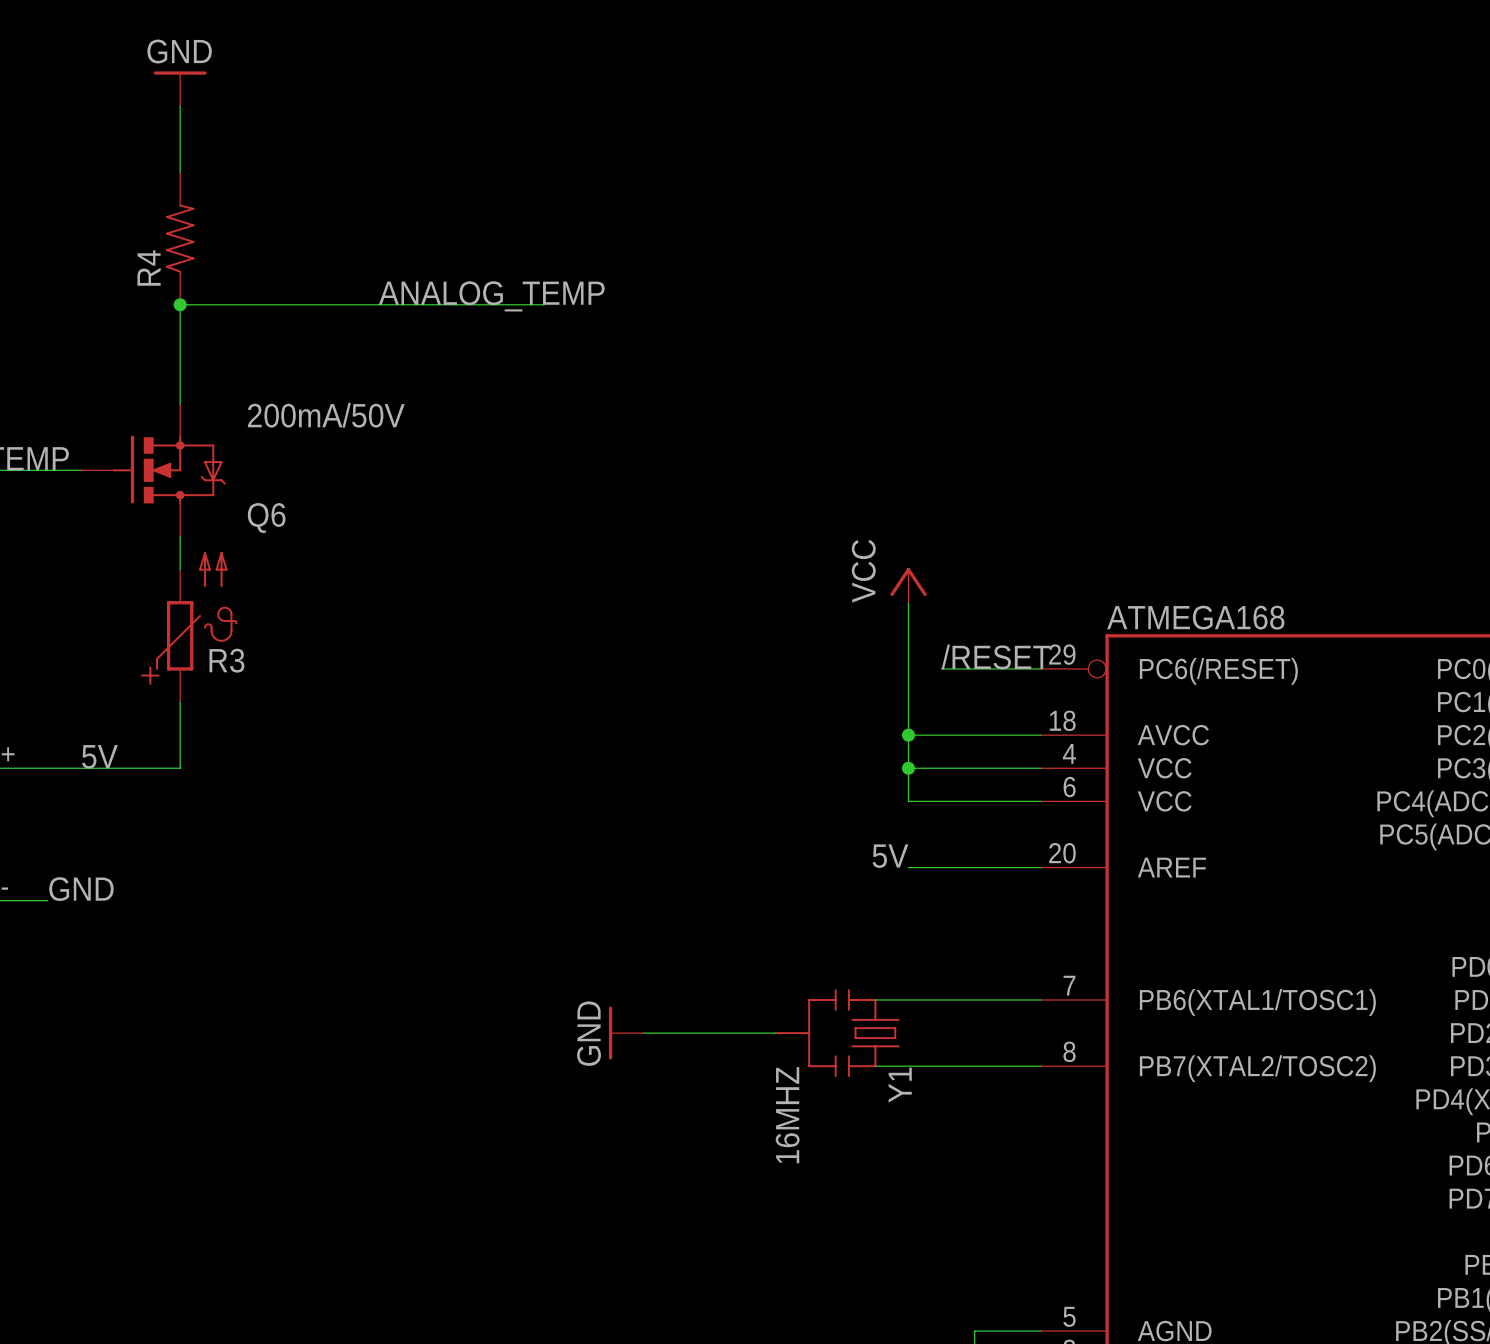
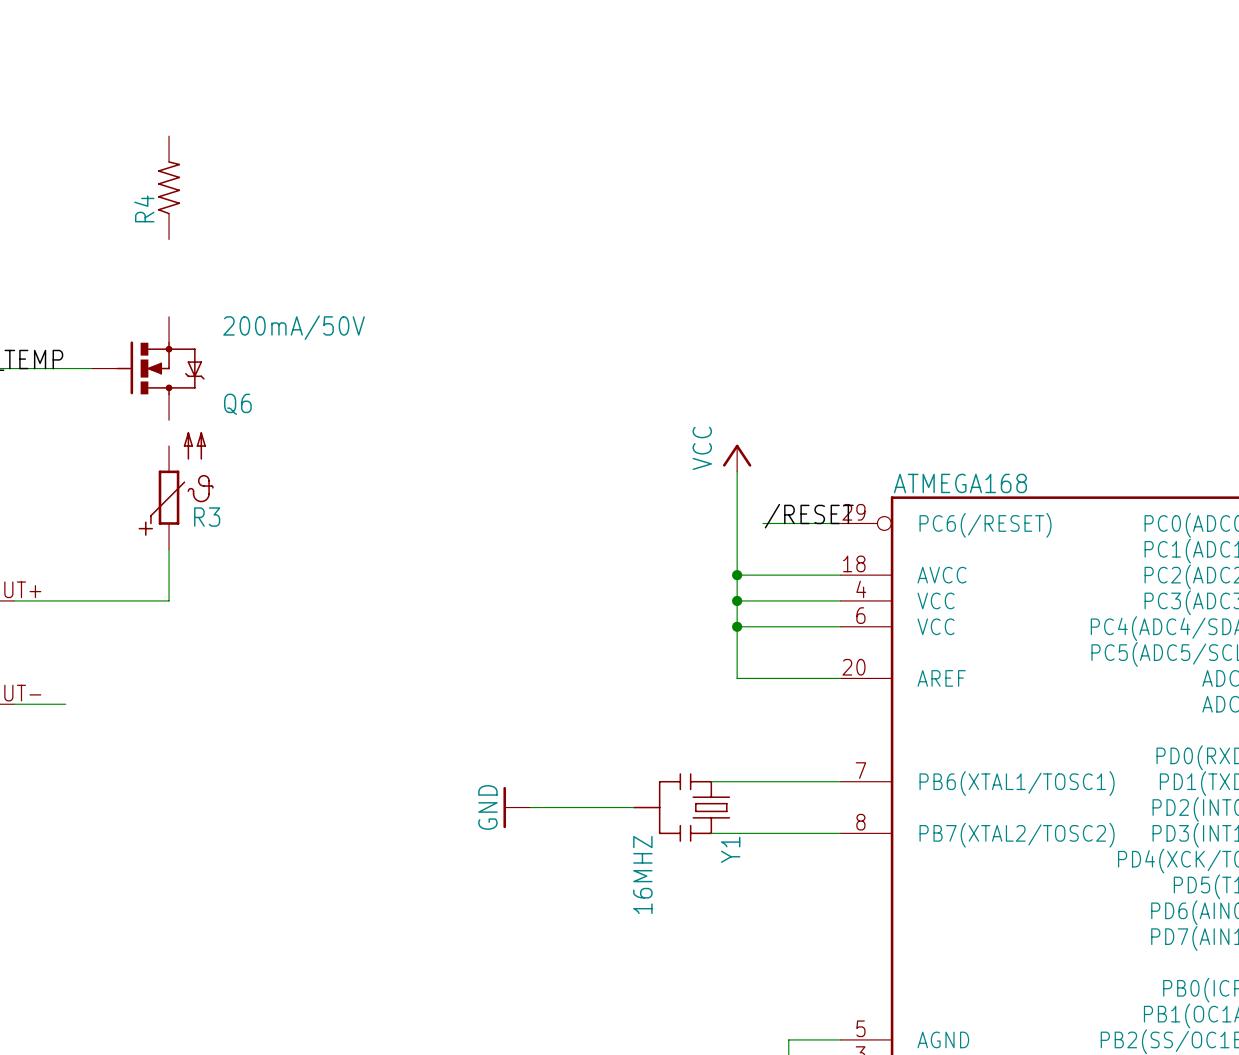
power symbol: GND (180, 88) -> none
wire: (180, 106) (180, 172) -> none
label: ANALOG_TEMP (491, 296) -> none
junction: (180, 304) -> none
wire: (544, 304) (180, 304) (180, 404) -> none
wire: (180, 536) (180, 569) -> none
label: 5V (99, 756) -> none
wire: none -> (737, 626) (737, 678)
junction: none -> (737, 626)
label: 5V (890, 856) -> none
label: GND (81, 889) -> none

